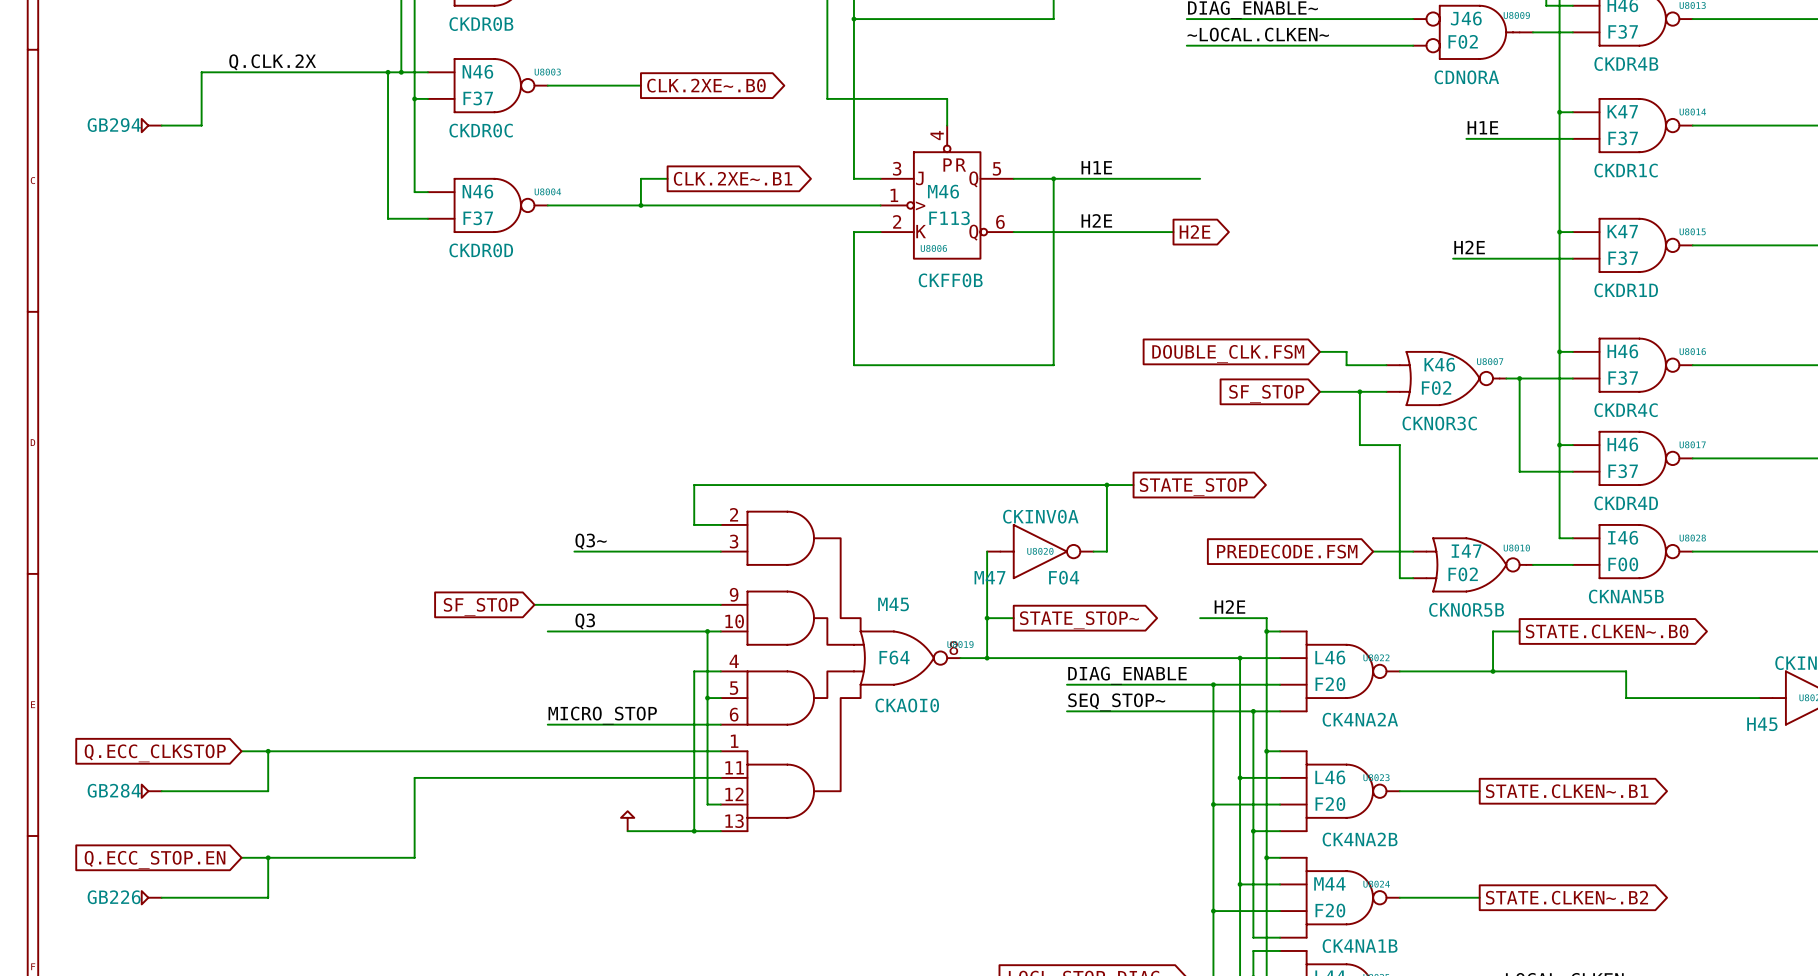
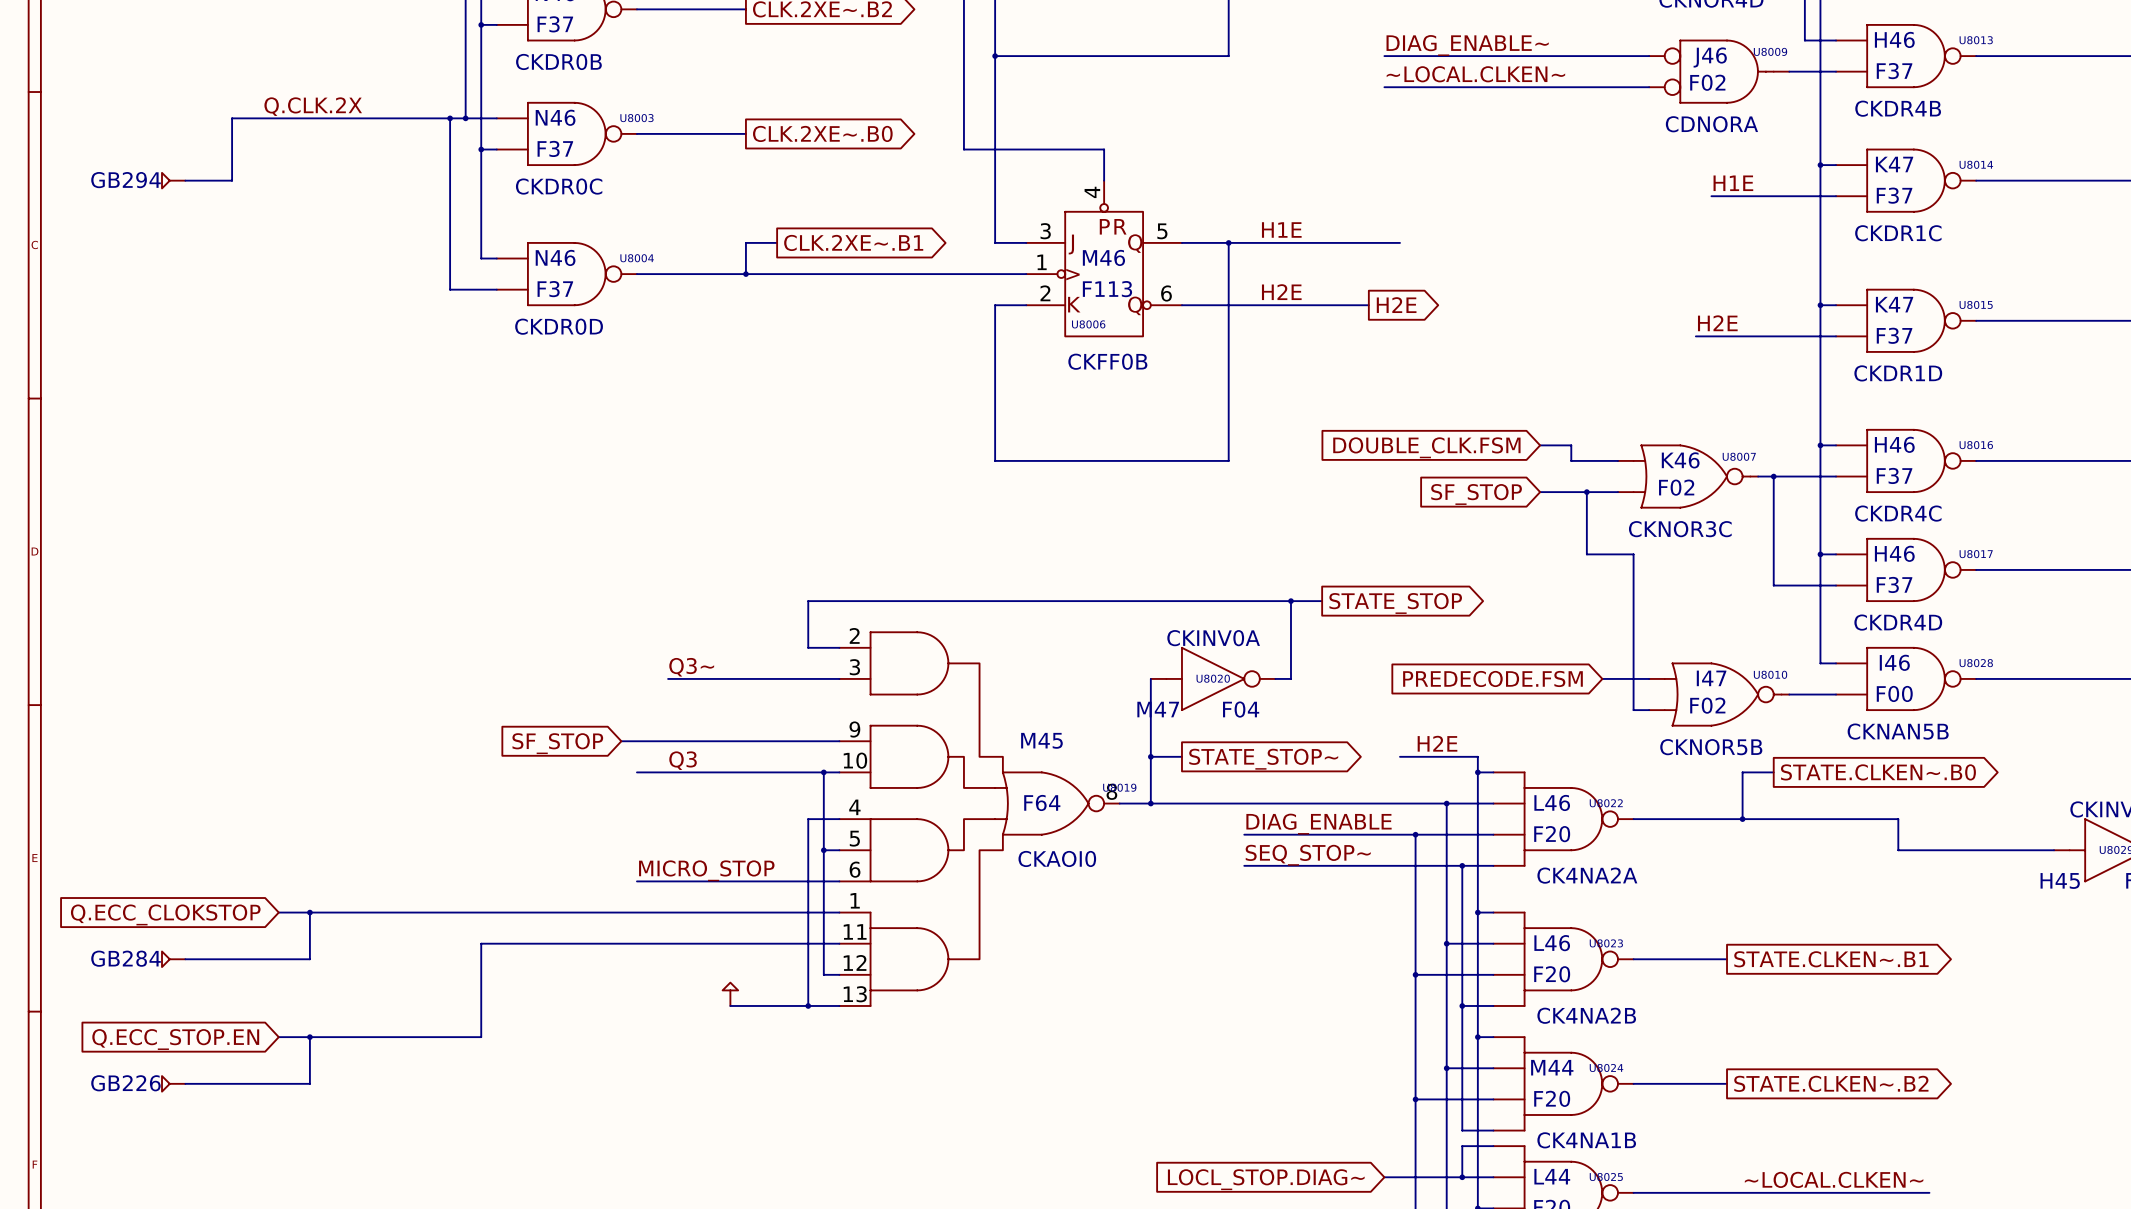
global label: Q.ECC_CLKSTOP (155, 753) -> Q.ECC_CLOKSTOP (165, 914)

